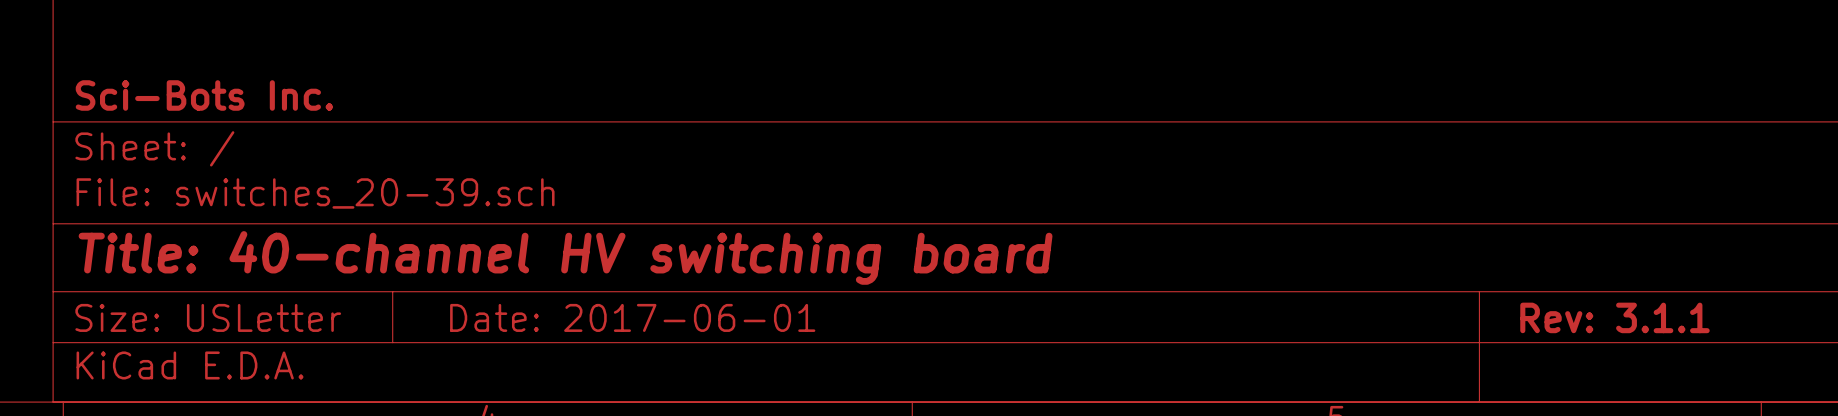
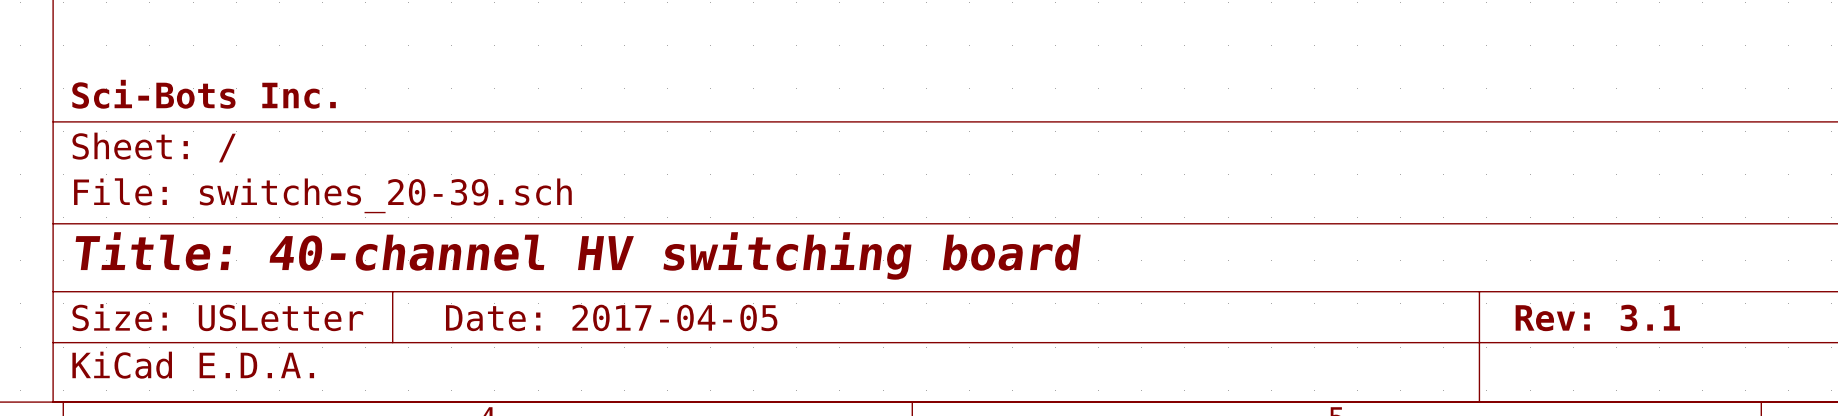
title block: Date: 2017-06-01 (632, 317) -> Date: 2017-04-05 (611, 317)
title block: Rev: 3.1.1 (1614, 317) -> Rev: 3.1 (1597, 317)

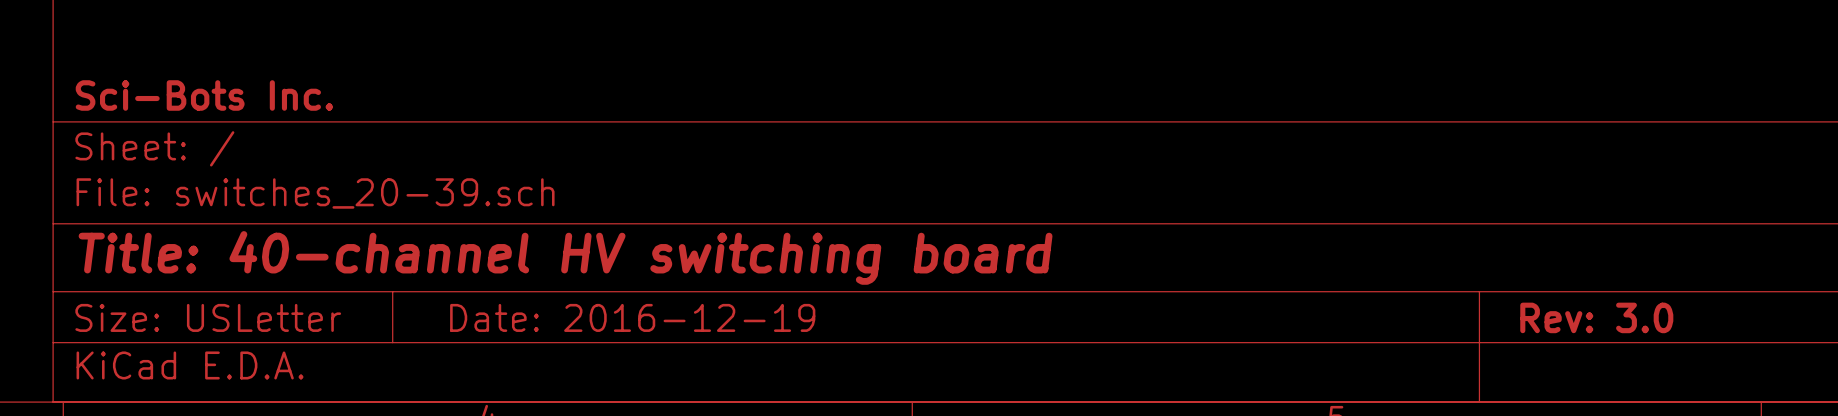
title block: Date: 2017-04-05 (611, 317) -> Date: 2016-12-19 (632, 317)
title block: Rev: 3.1 (1597, 317) -> Rev: 3.0 (1596, 317)

